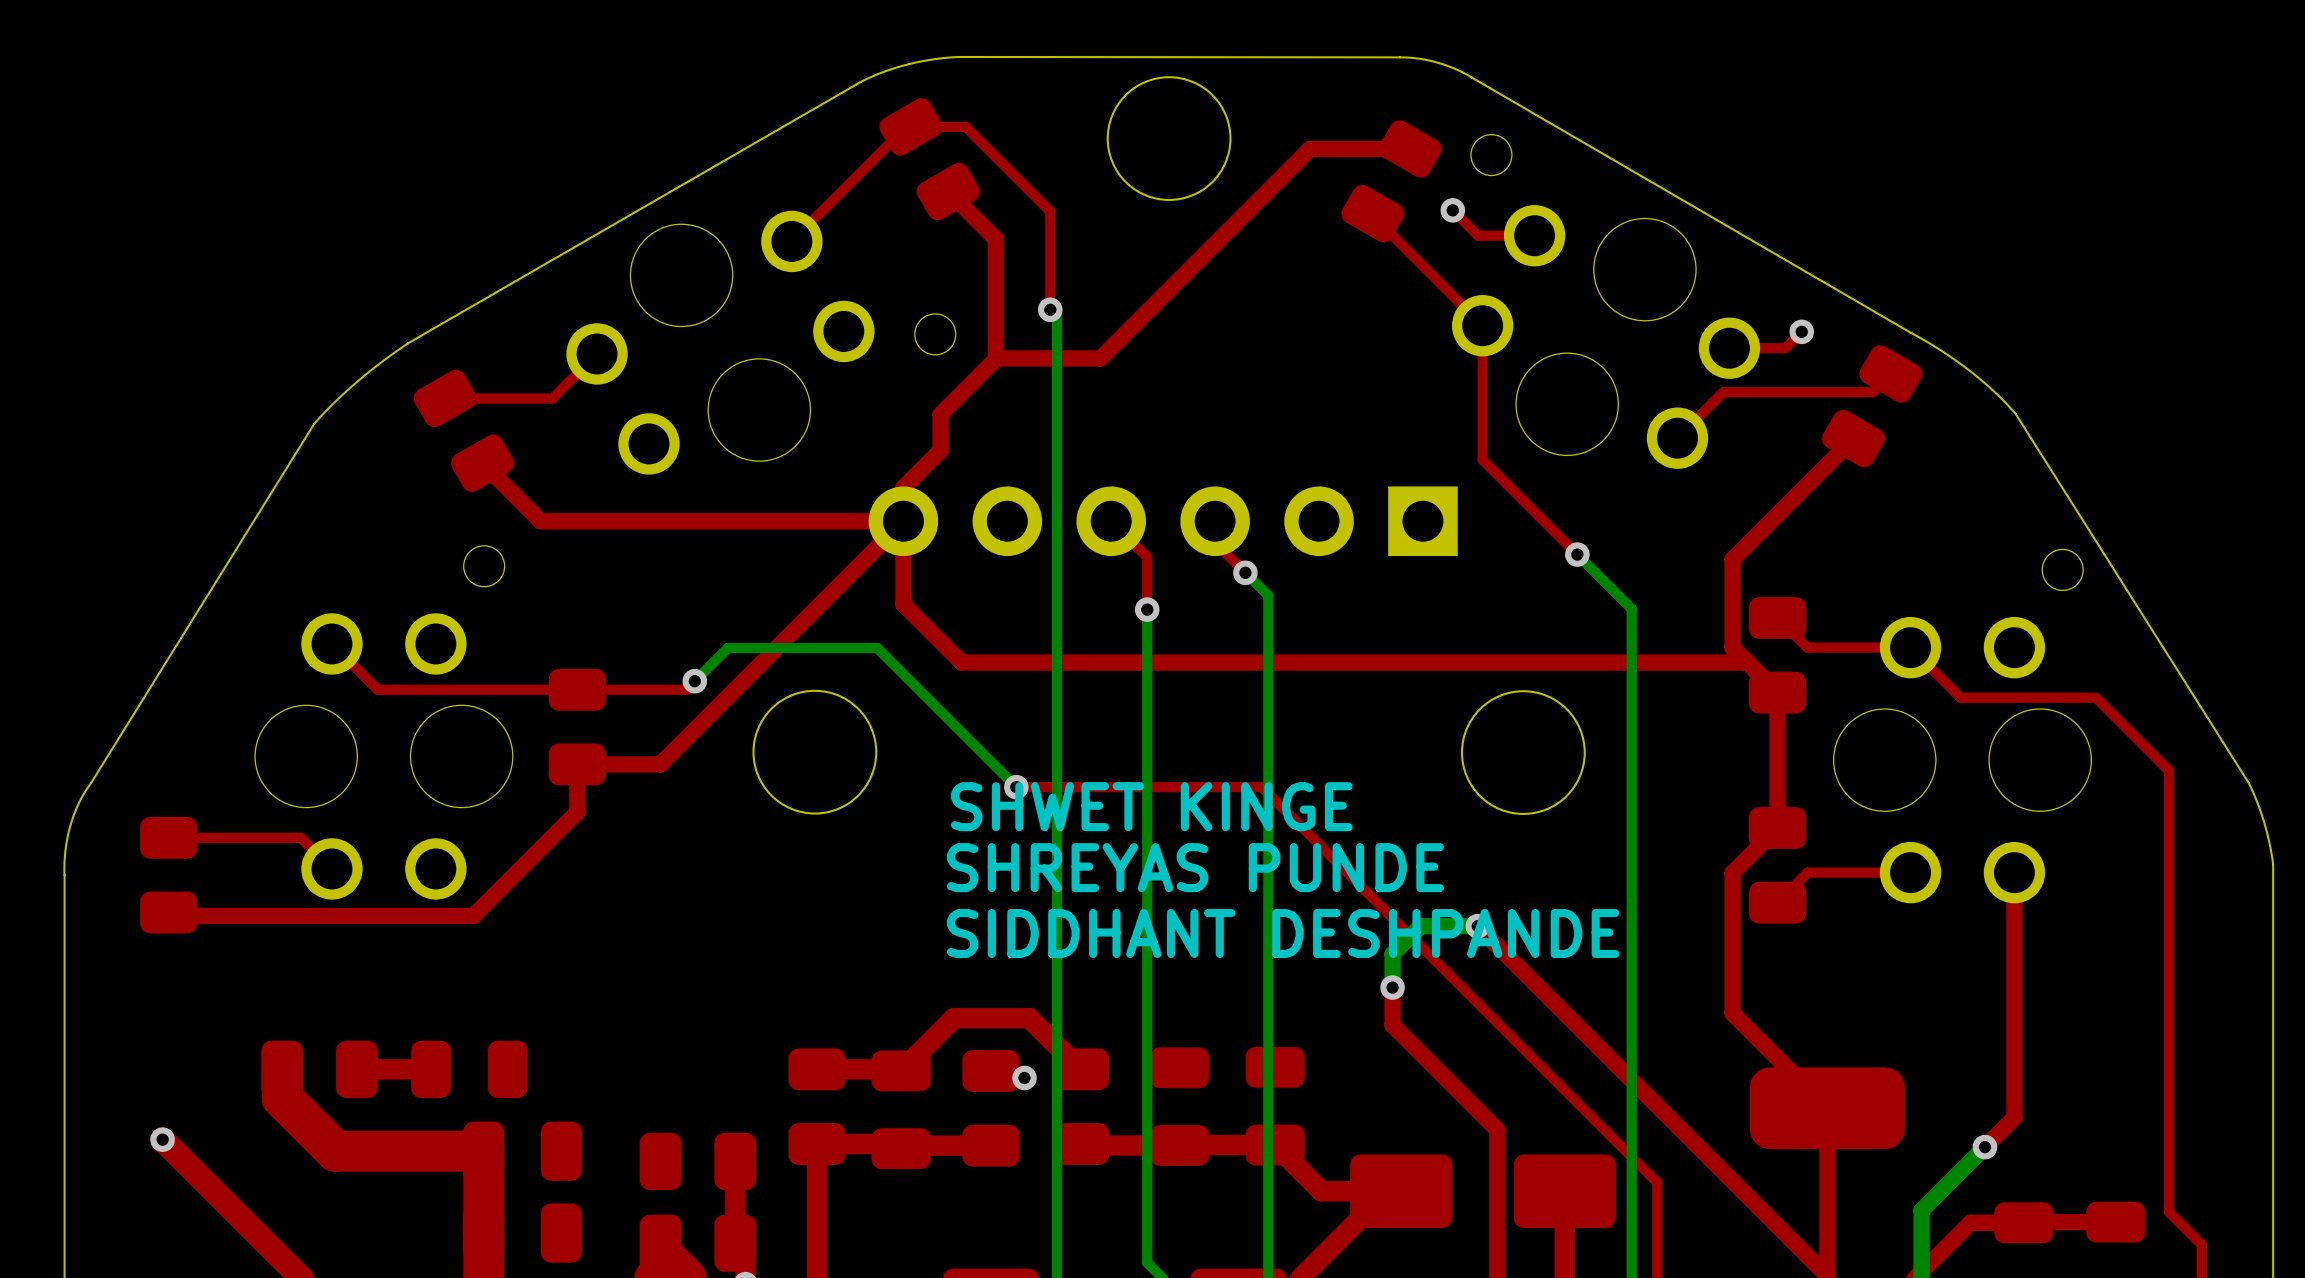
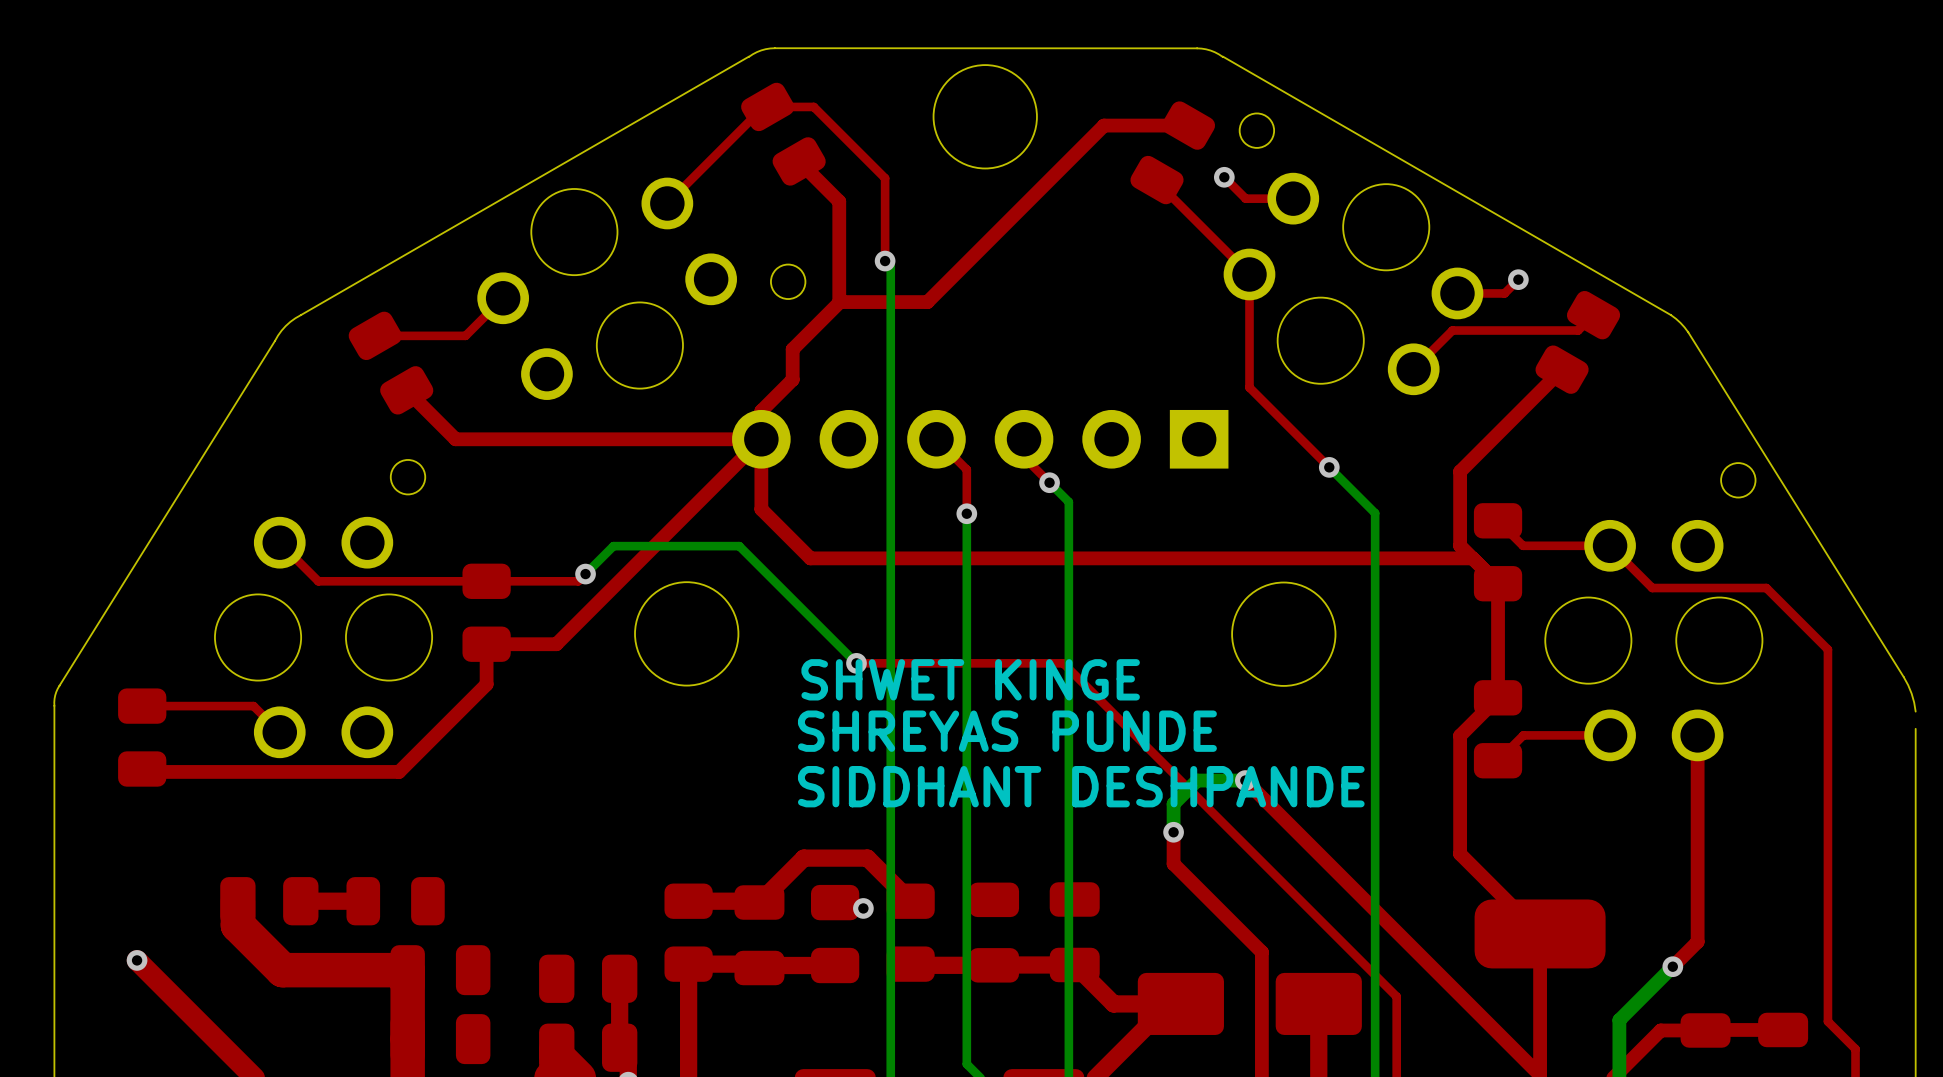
board edge: none -> (1222, 56) (1671, 315) (1680, 322) (1688, 332) (1903, 677) (1911, 693) (1915, 711)
board edge: (2273, 864) (2263, 820) (2248, 783) (2015, 413) (1981, 380) (1933, 345) (1468, 75) (1440, 63) (1421, 59) (1400, 57) (960, 56) (935, 59) (905, 65) (860, 81) (408, 343) (376, 365) (344, 393) (314, 423) (85, 790) (77, 806) (69, 830) (65, 850) (64, 875) -> (1222, 56) (1210, 50) (1197, 48) (774, 48) (761, 50) (295, 318) (278, 335) (57, 688) (54, 702) (54, 737)

